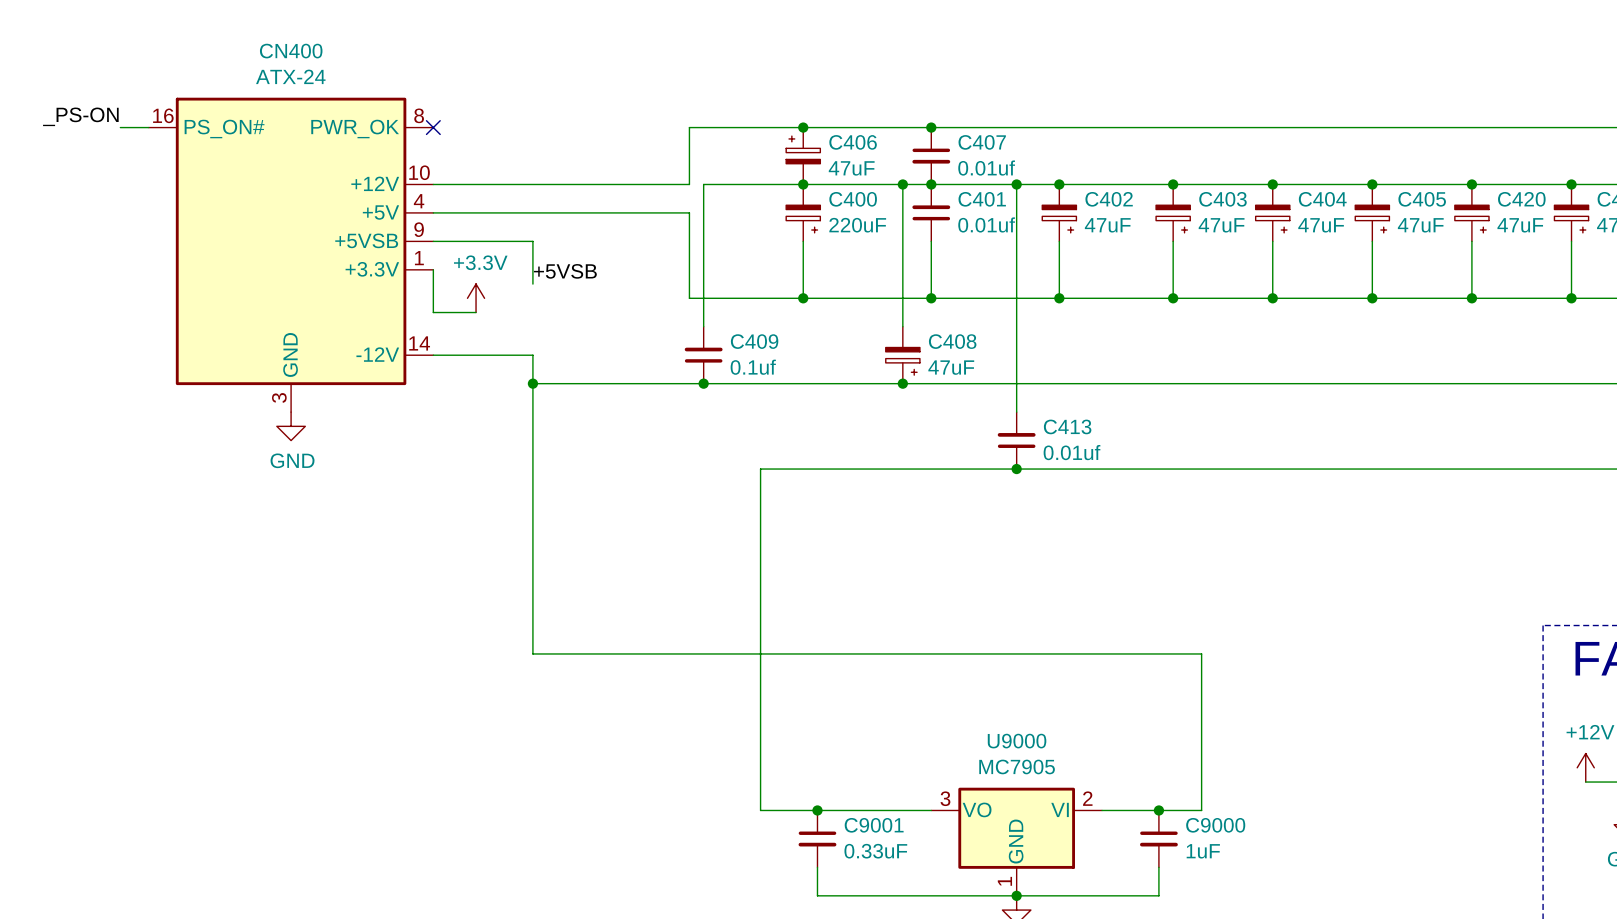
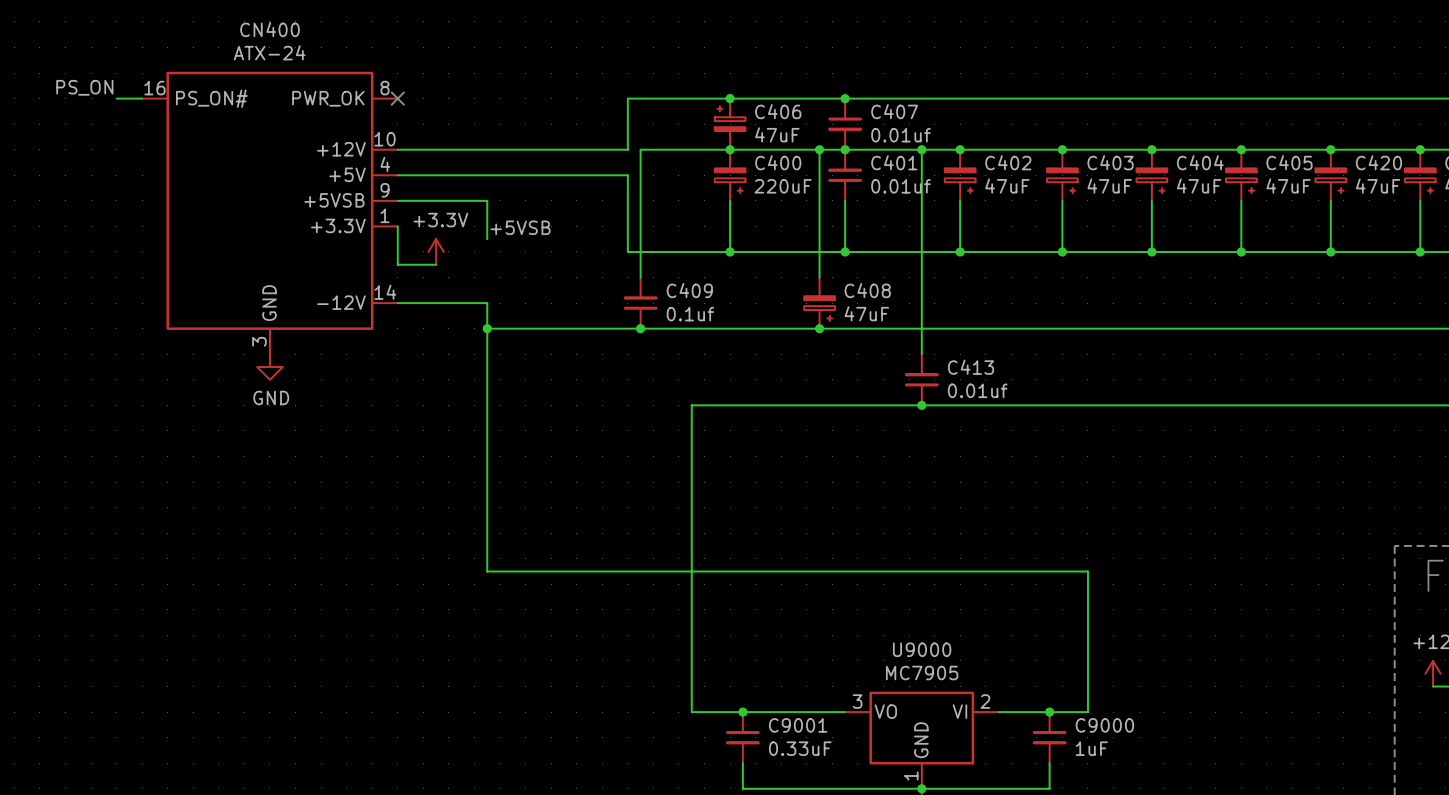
label: _PS-ON (80, 116) -> PS_ON (84, 87)

